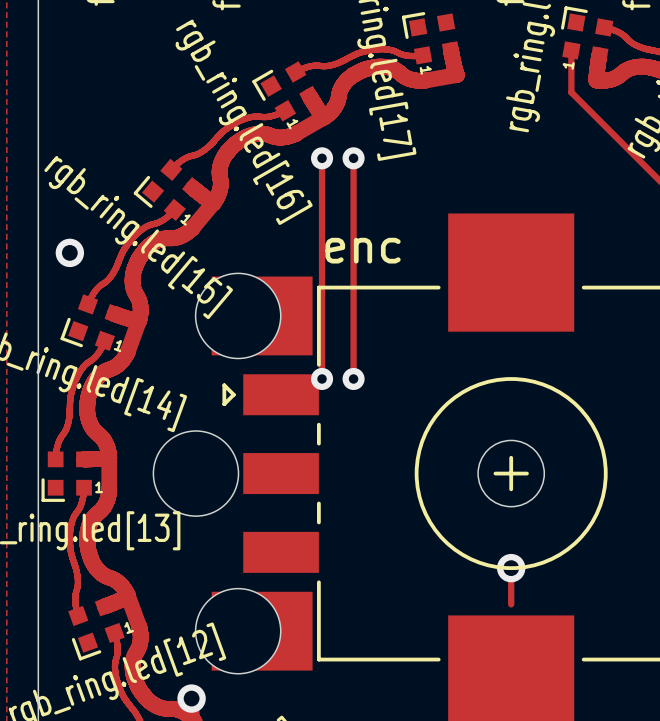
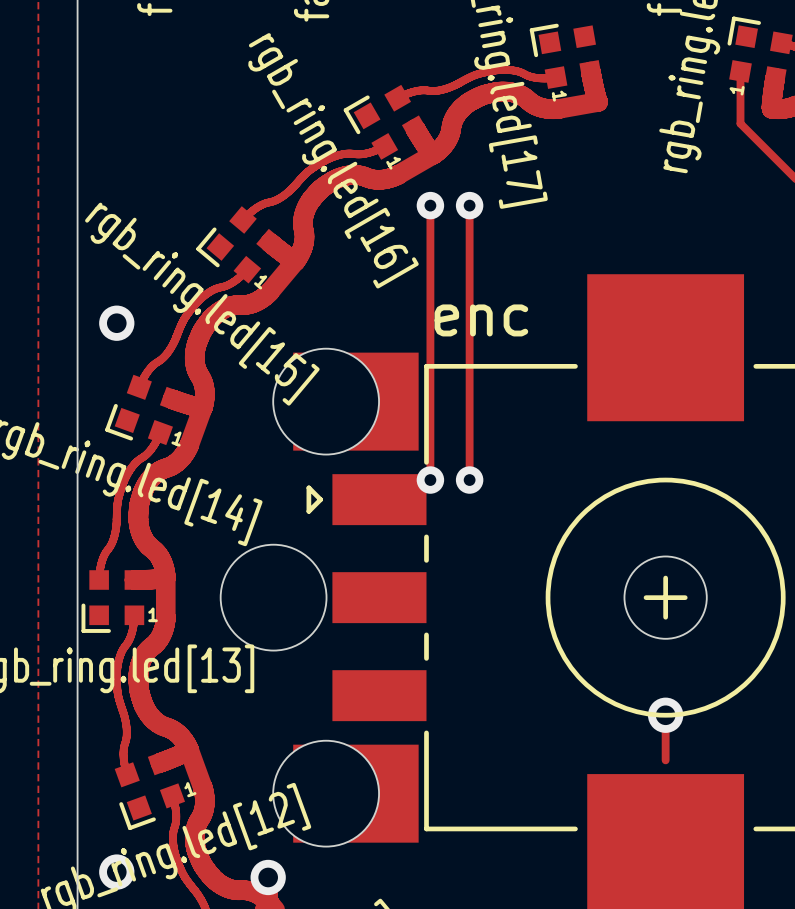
via: none -> (116, 872)

